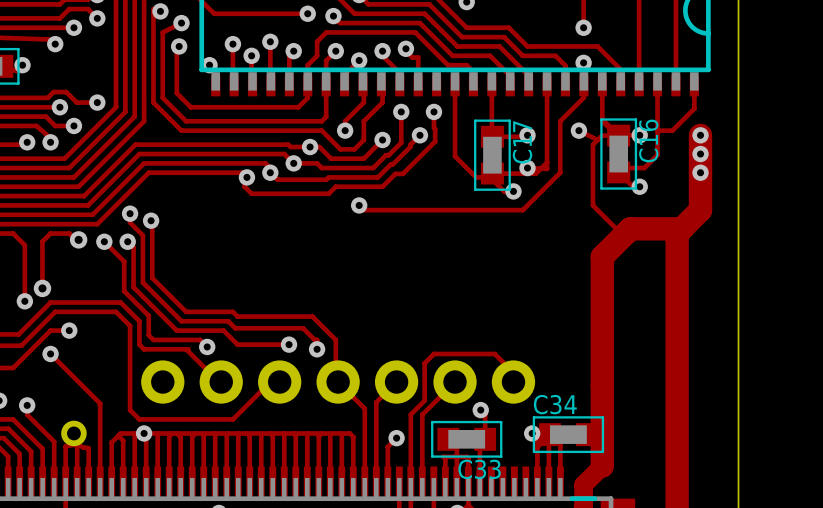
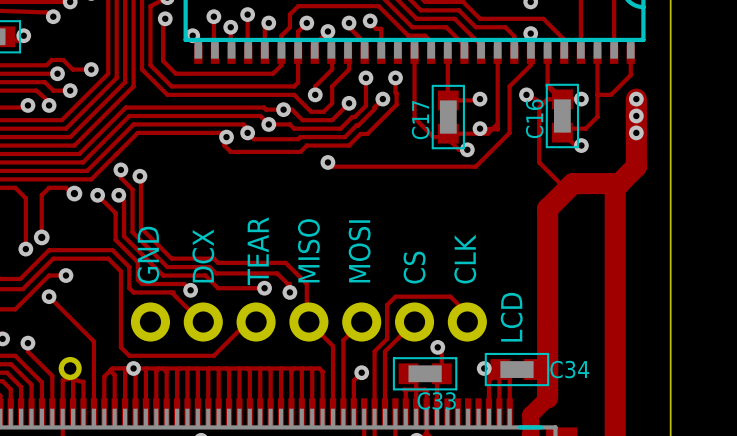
C16 name position: C16 (648, 140) -> C16 (534, 118)
C17 name position: C17 (522, 142) -> C17 (420, 120)
text: none -> TEAR (258, 251)
text: none -> MISO (308, 250)
text: none -> MOSI (359, 251)
text: none -> GND (148, 255)
text: none -> DCX (203, 256)
text: none -> CLK (465, 259)
text: none -> CS (414, 267)
text: none -> LCD (511, 317)
C34 name position: C34 (555, 404) -> C34 (569, 369)

